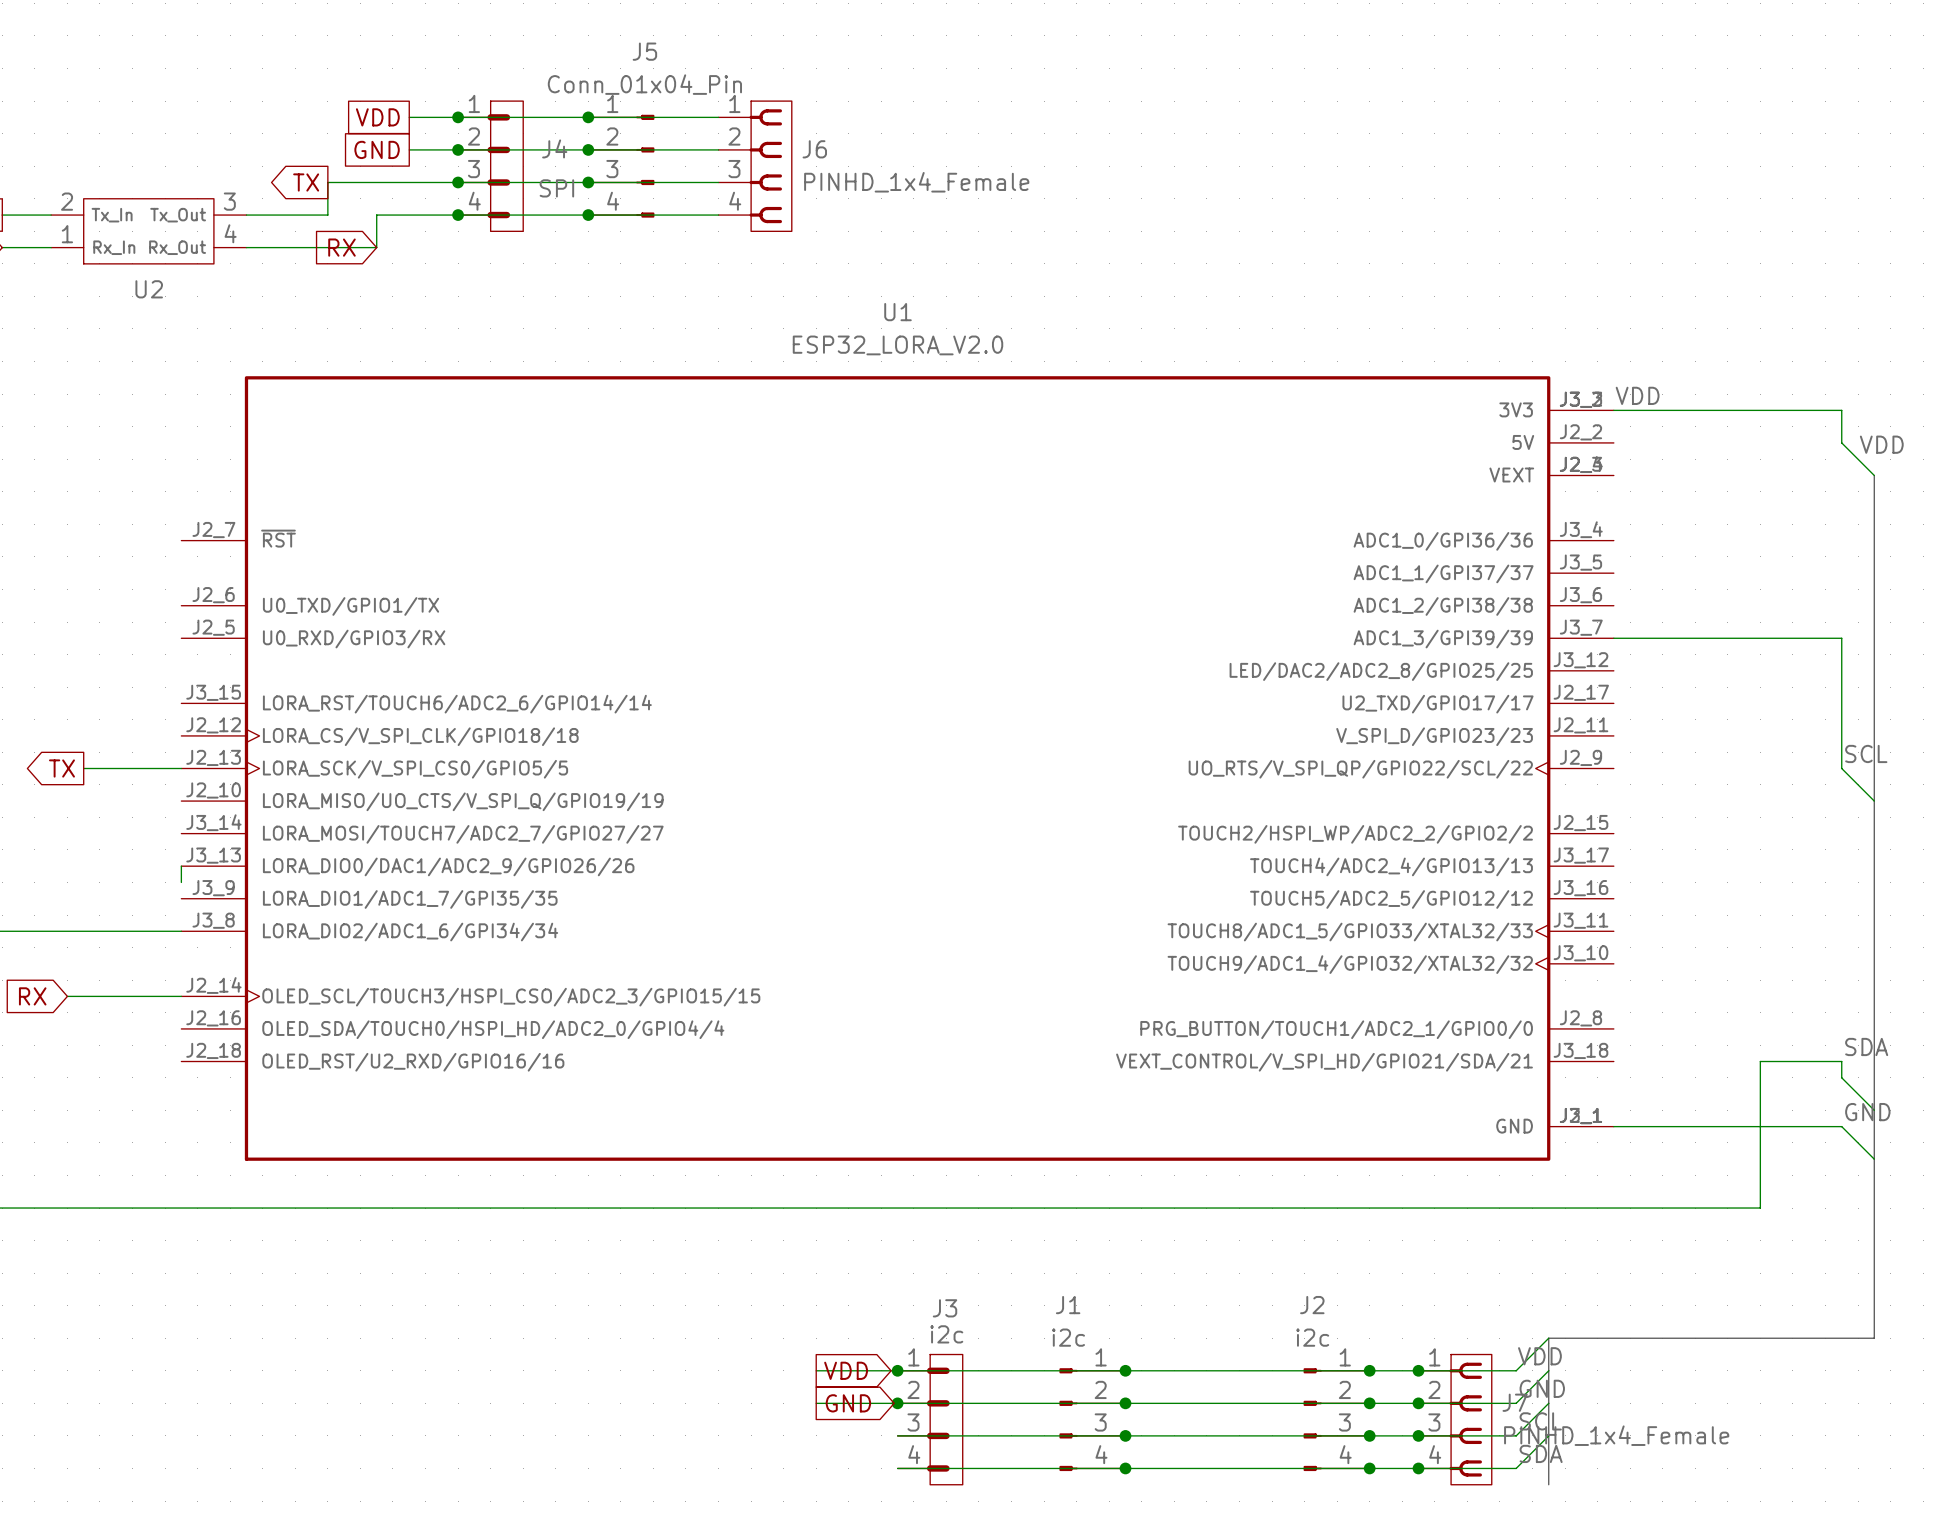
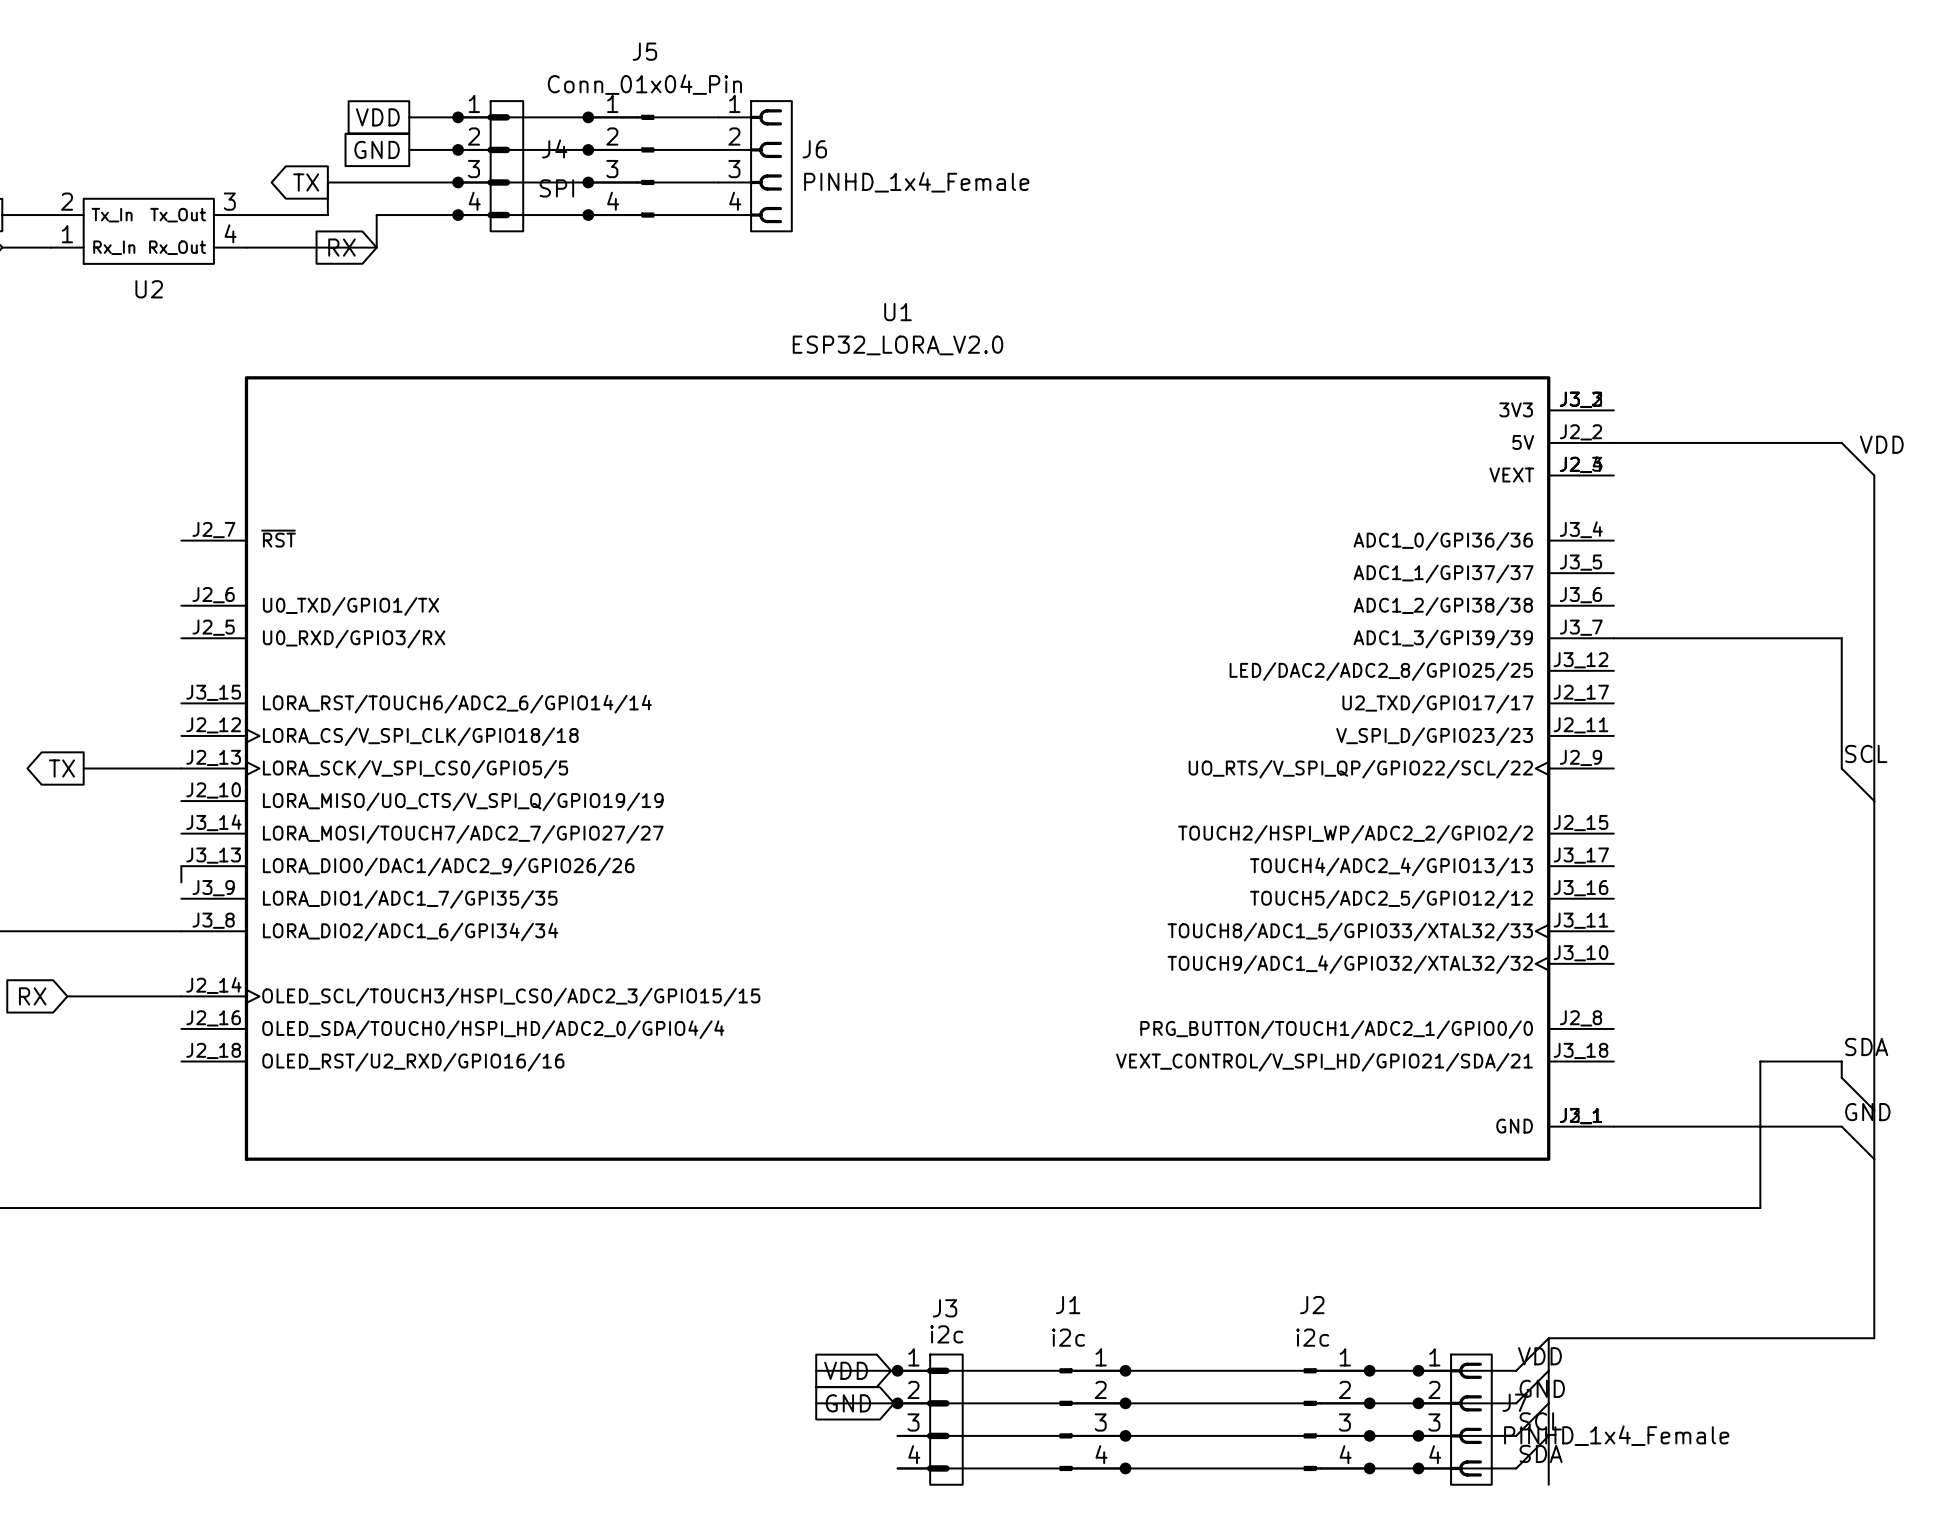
label: VDD (1637, 395) -> none
wire: (1613, 410) (1841, 410) (1841, 442) -> (1613, 442) (1841, 442)

